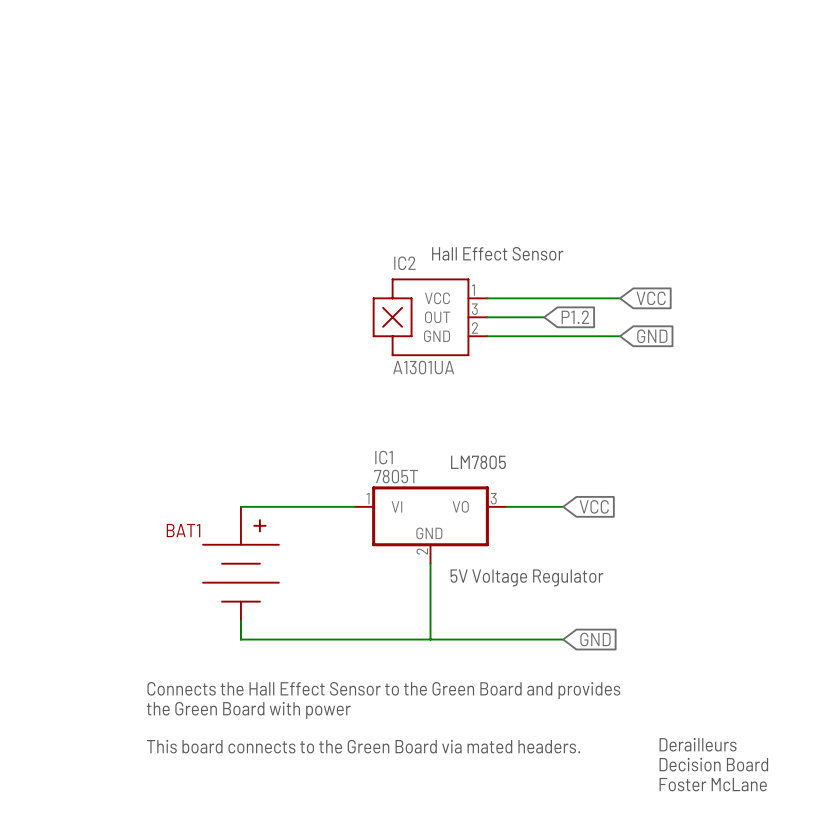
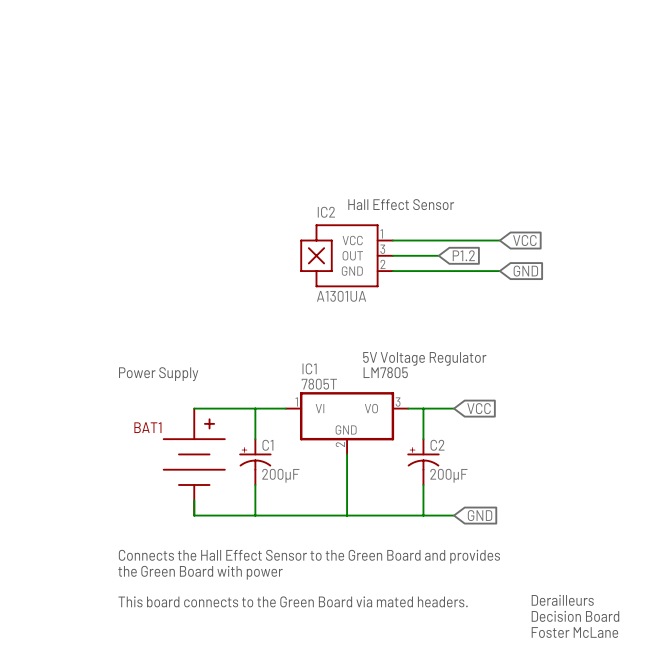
text: none -> Power Supply (158, 374)
wire: none -> (255, 408) (255, 439)
wire: none -> (423, 408) (423, 439)
C1: none -> 200µF (255, 462)
C2: none -> 200µF (423, 462)
text position: 5V Voltage Regulator (527, 577) -> 5V Voltage Regulator (424, 358)
wire: none -> (255, 485) (255, 515)
wire: none -> (423, 485) (423, 515)

